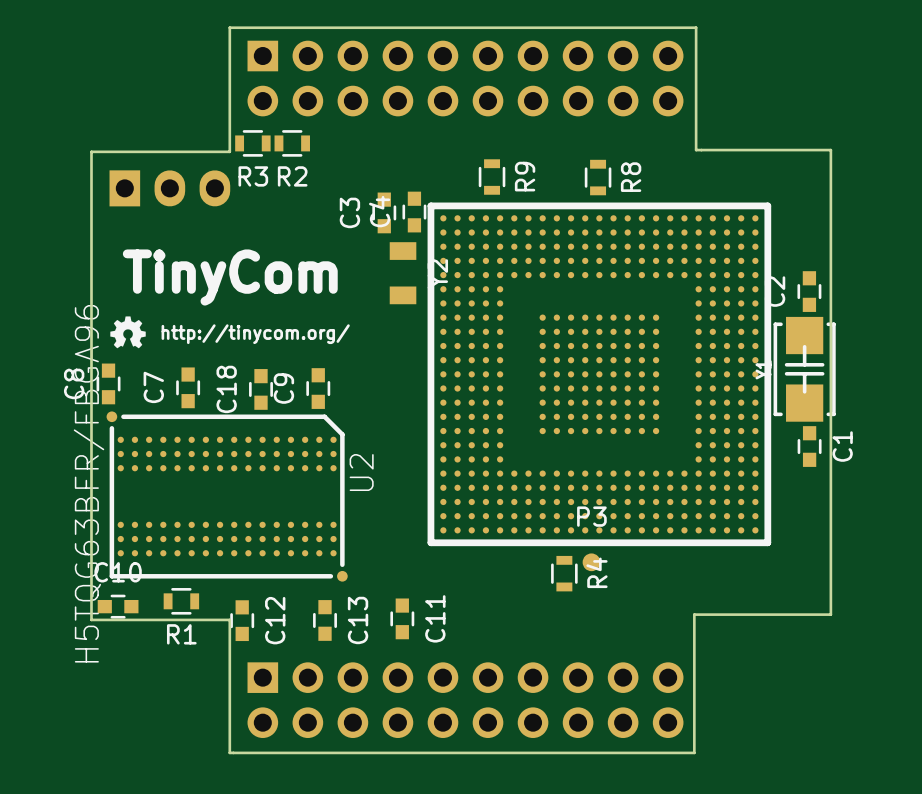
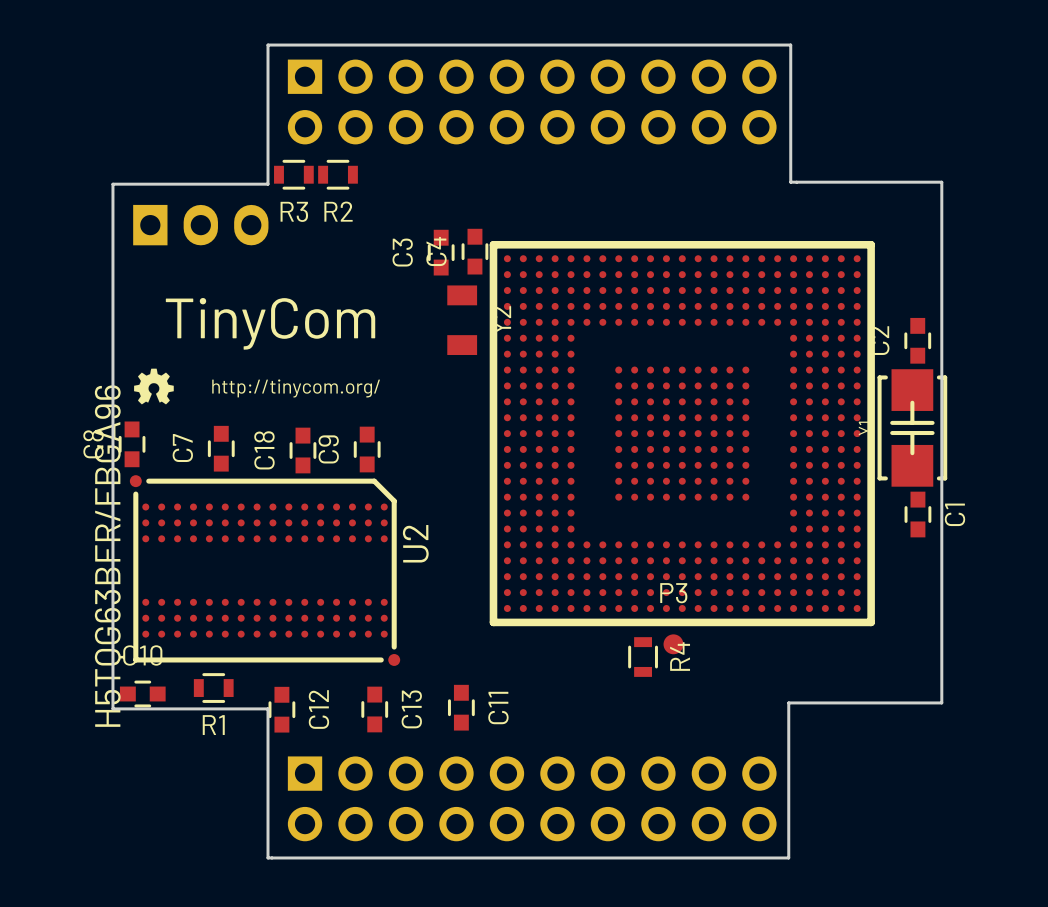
R9: (492, 177) -> none
R8: (598, 177) -> none

